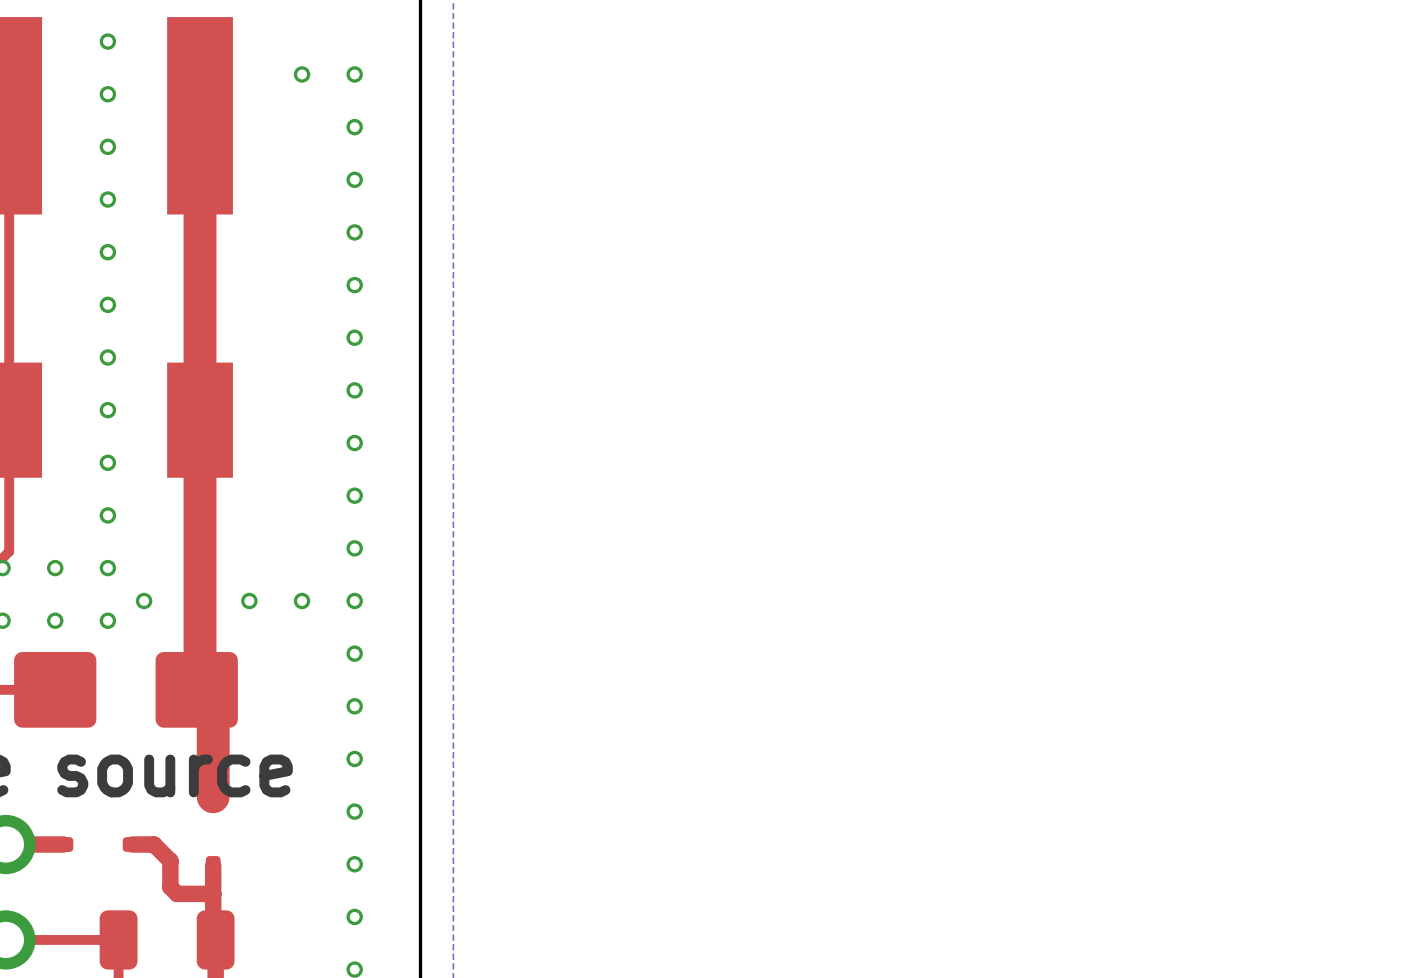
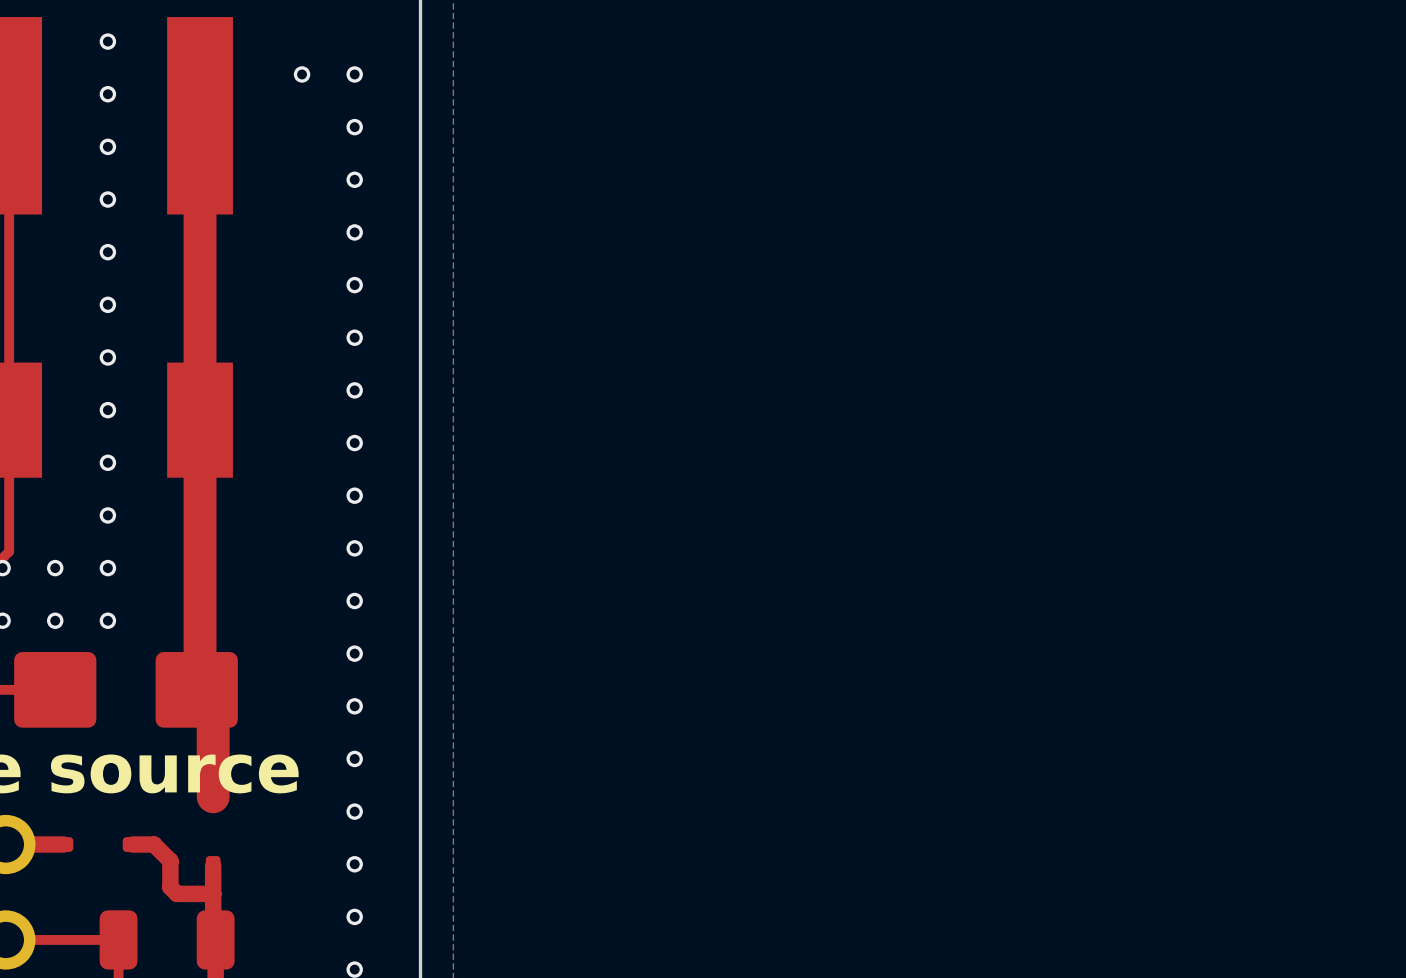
via: (144, 601) -> none
via: (249, 601) -> none
via: (302, 601) -> none

